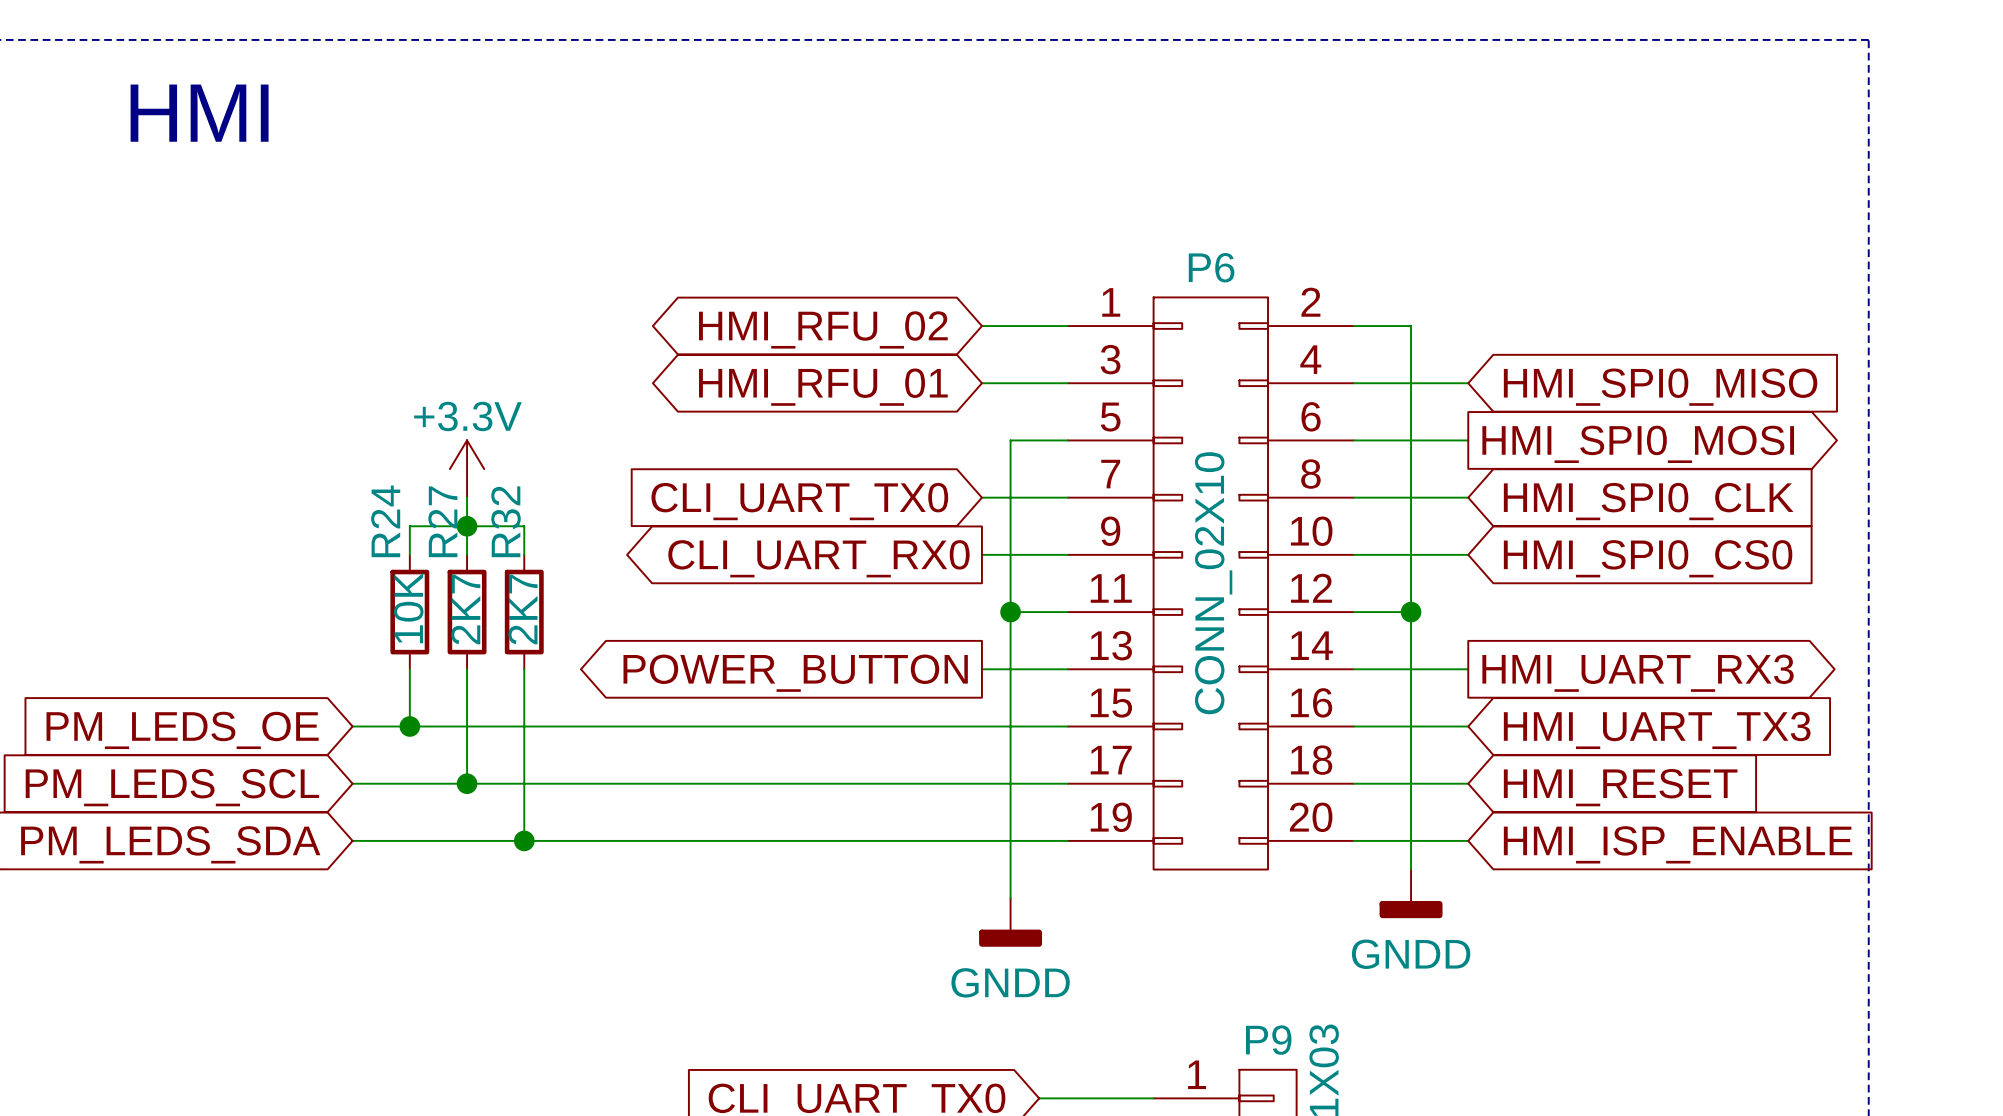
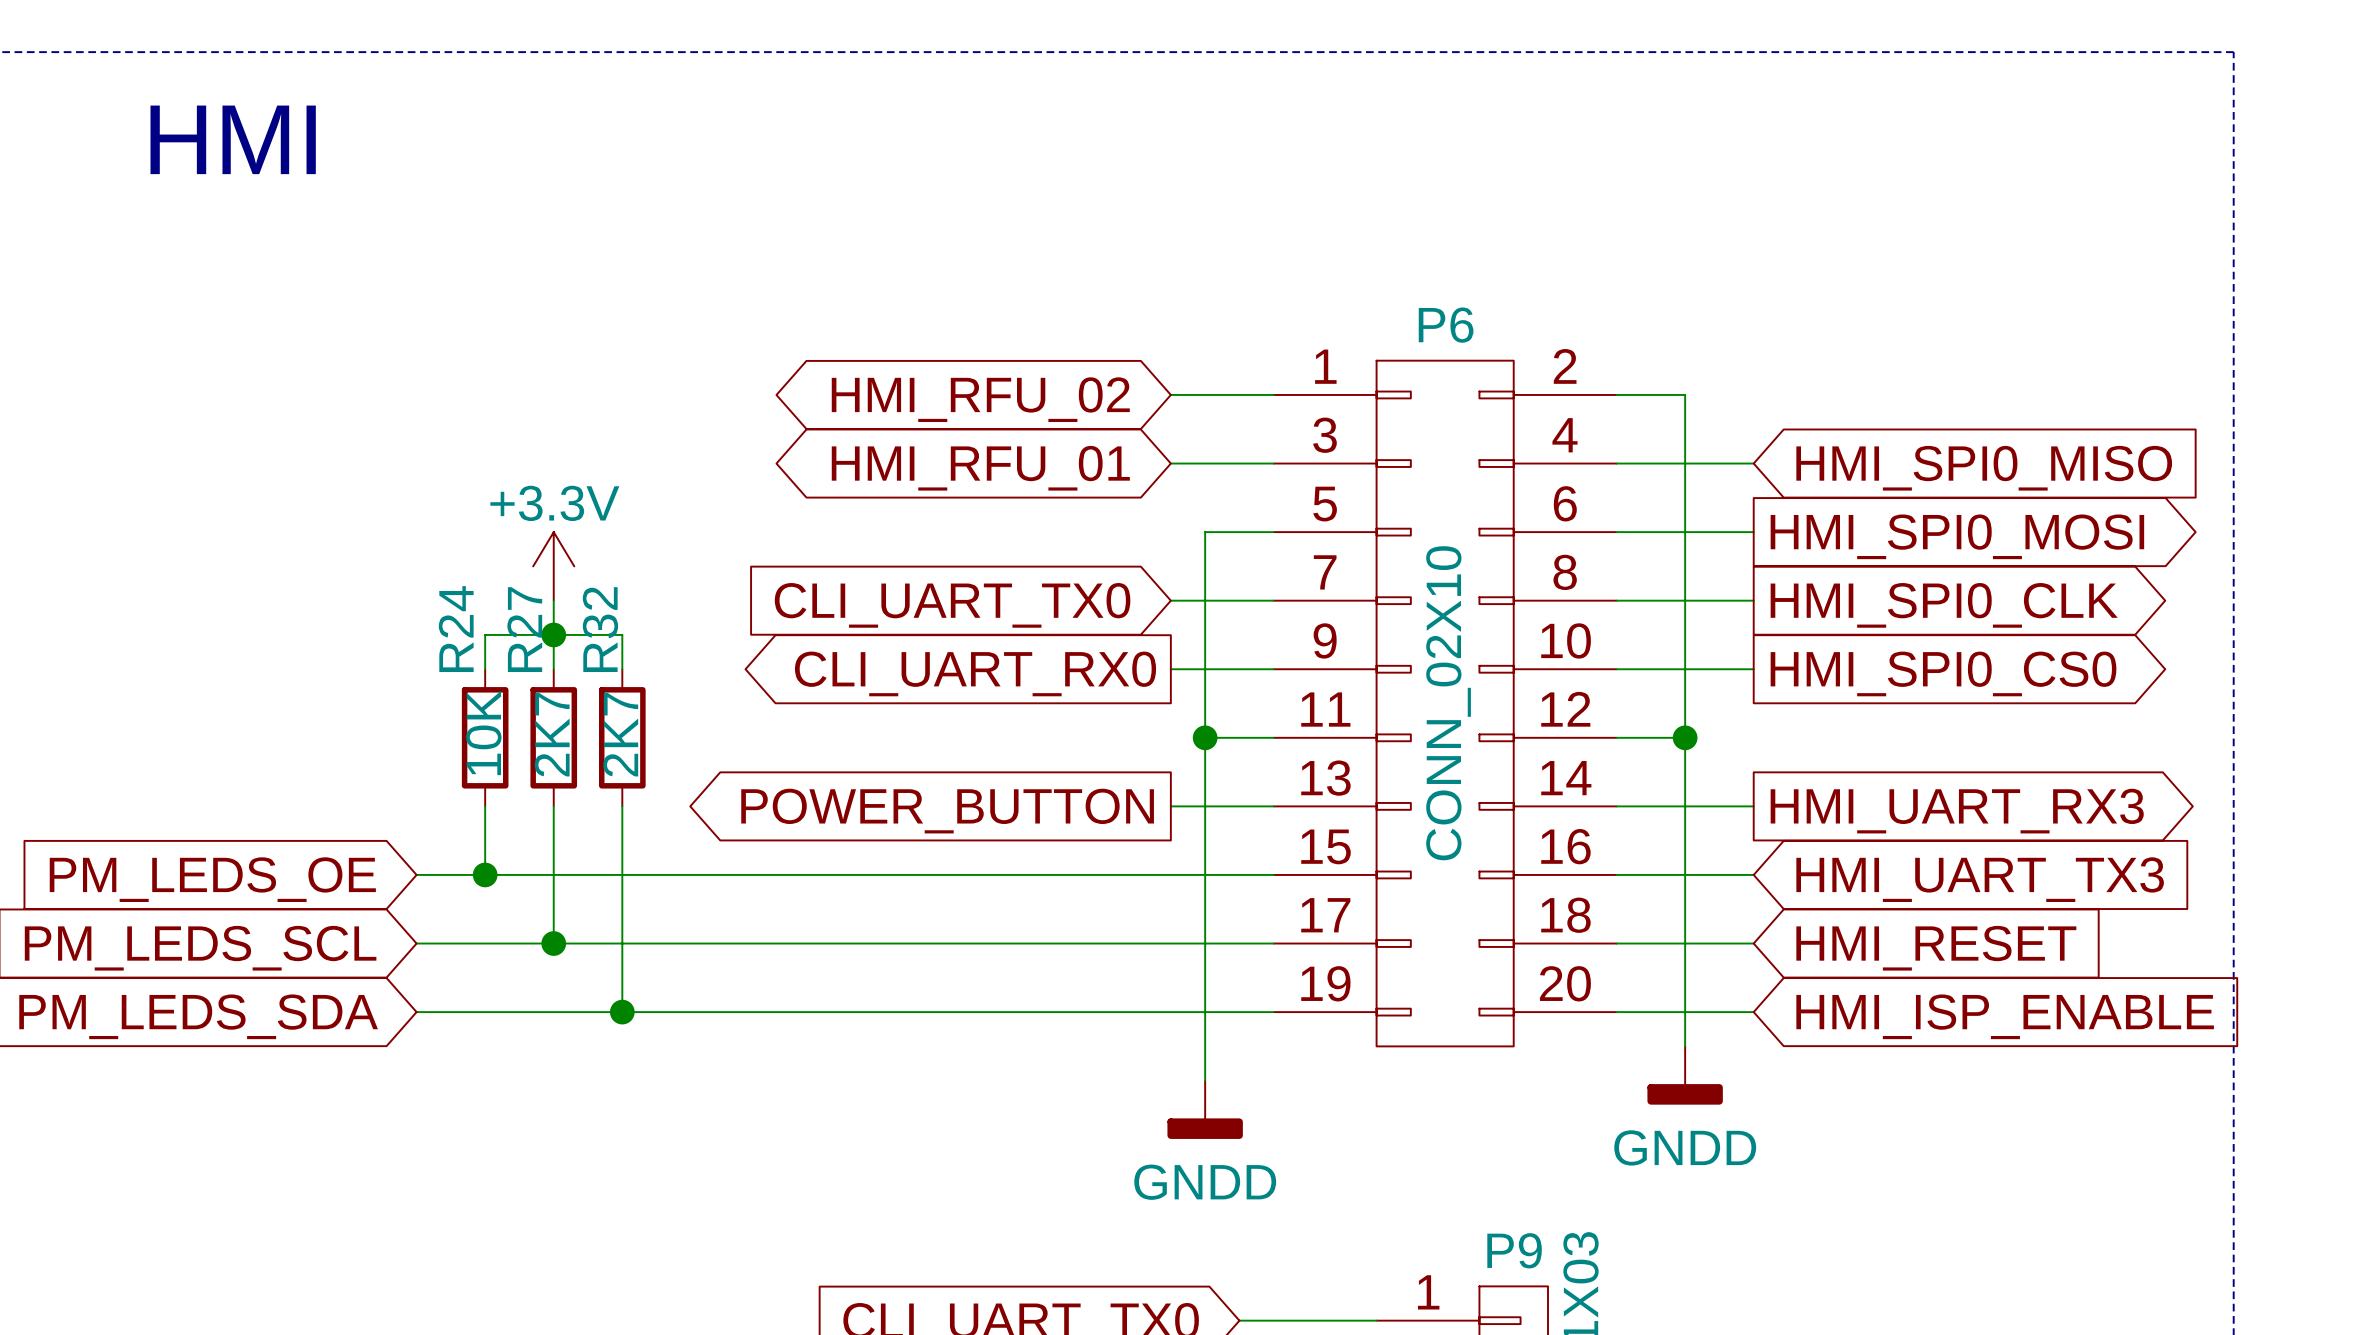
global label shape: input (1648, 501) -> output (1944, 605)
global label shape: input (1648, 558) -> output (1943, 673)

